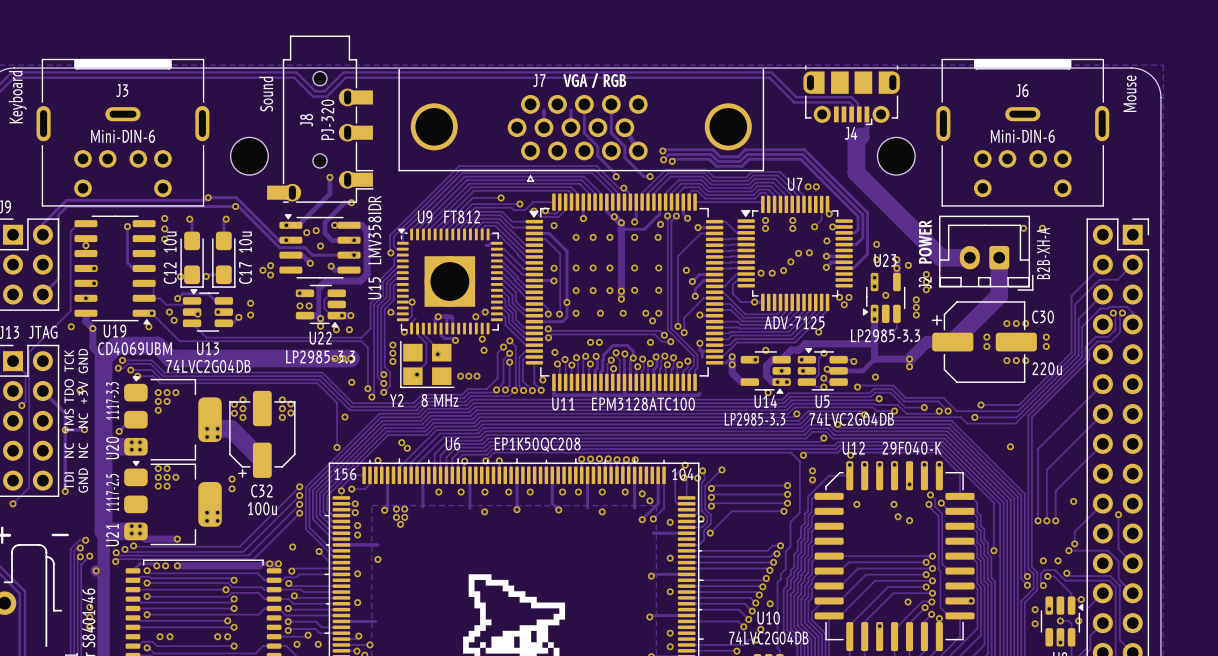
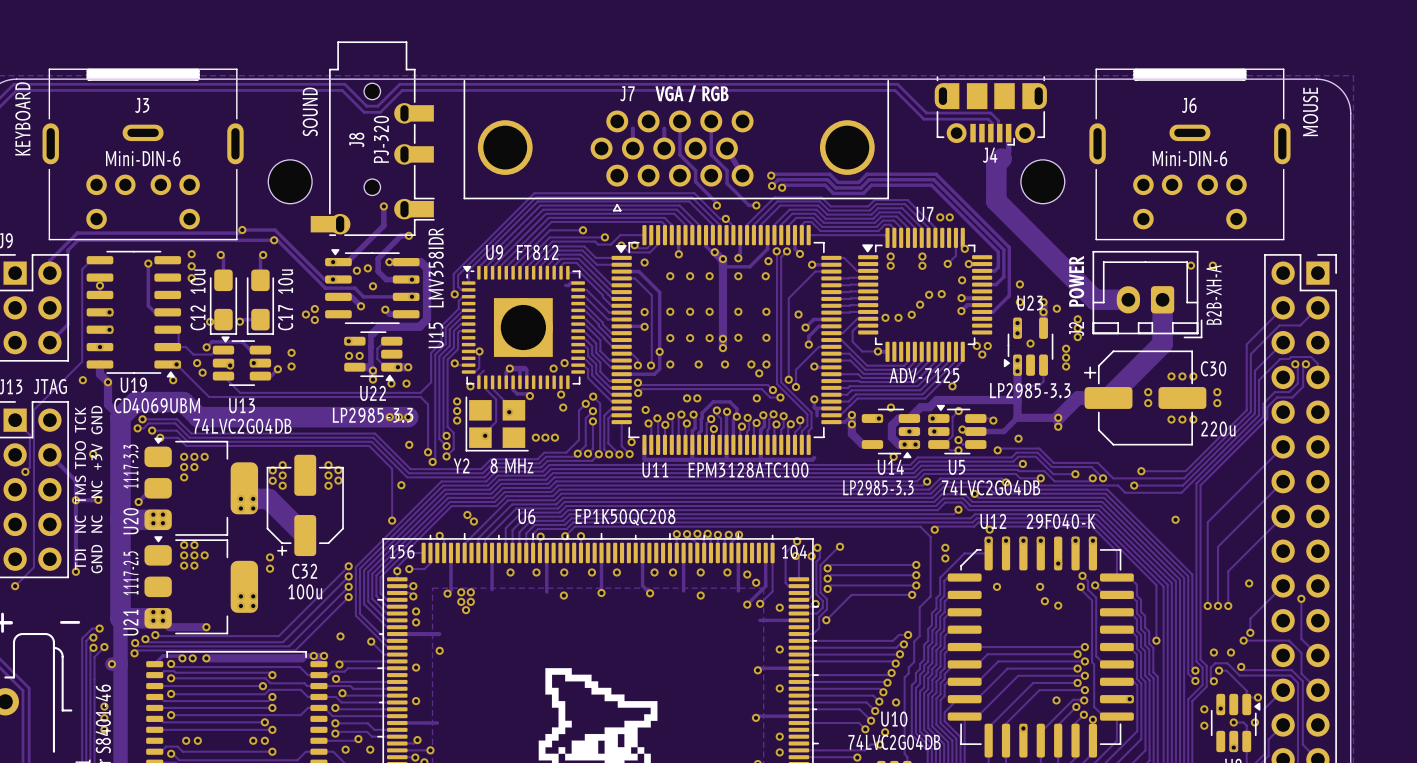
J6 text: Mouse (1129, 93) -> MOUSE (1310, 111)
J8 text: Sound (266, 94) -> SOUND (310, 111)
J3 text: Keyboard (17, 97) -> KEYBOARD (22, 118)

